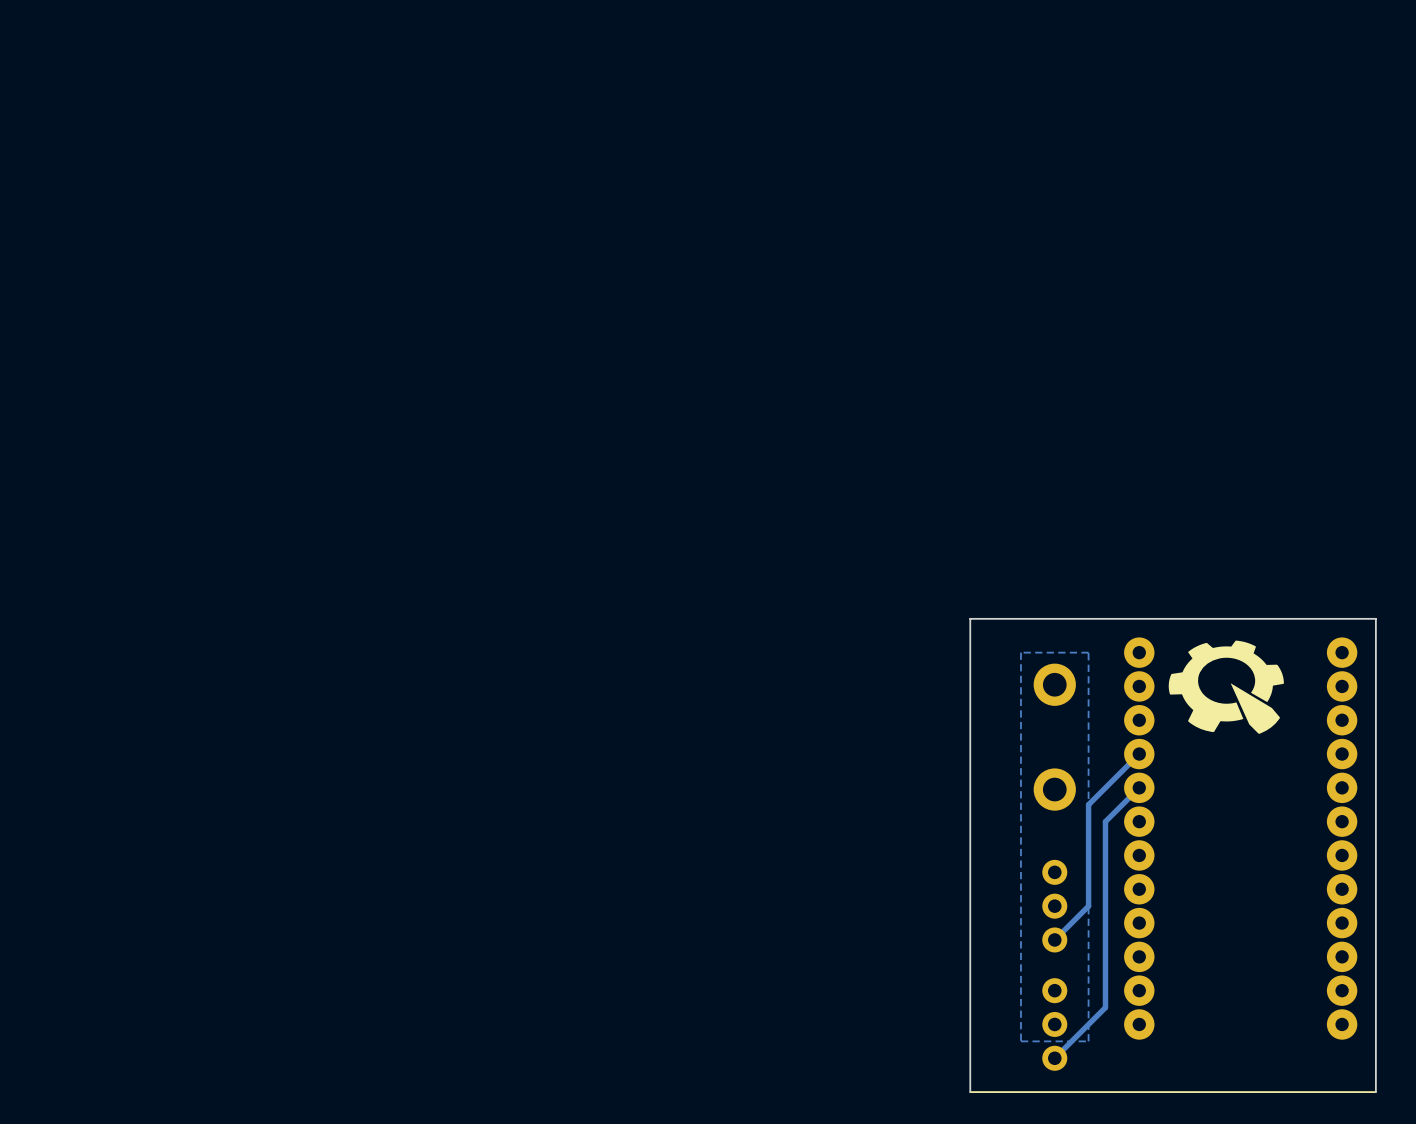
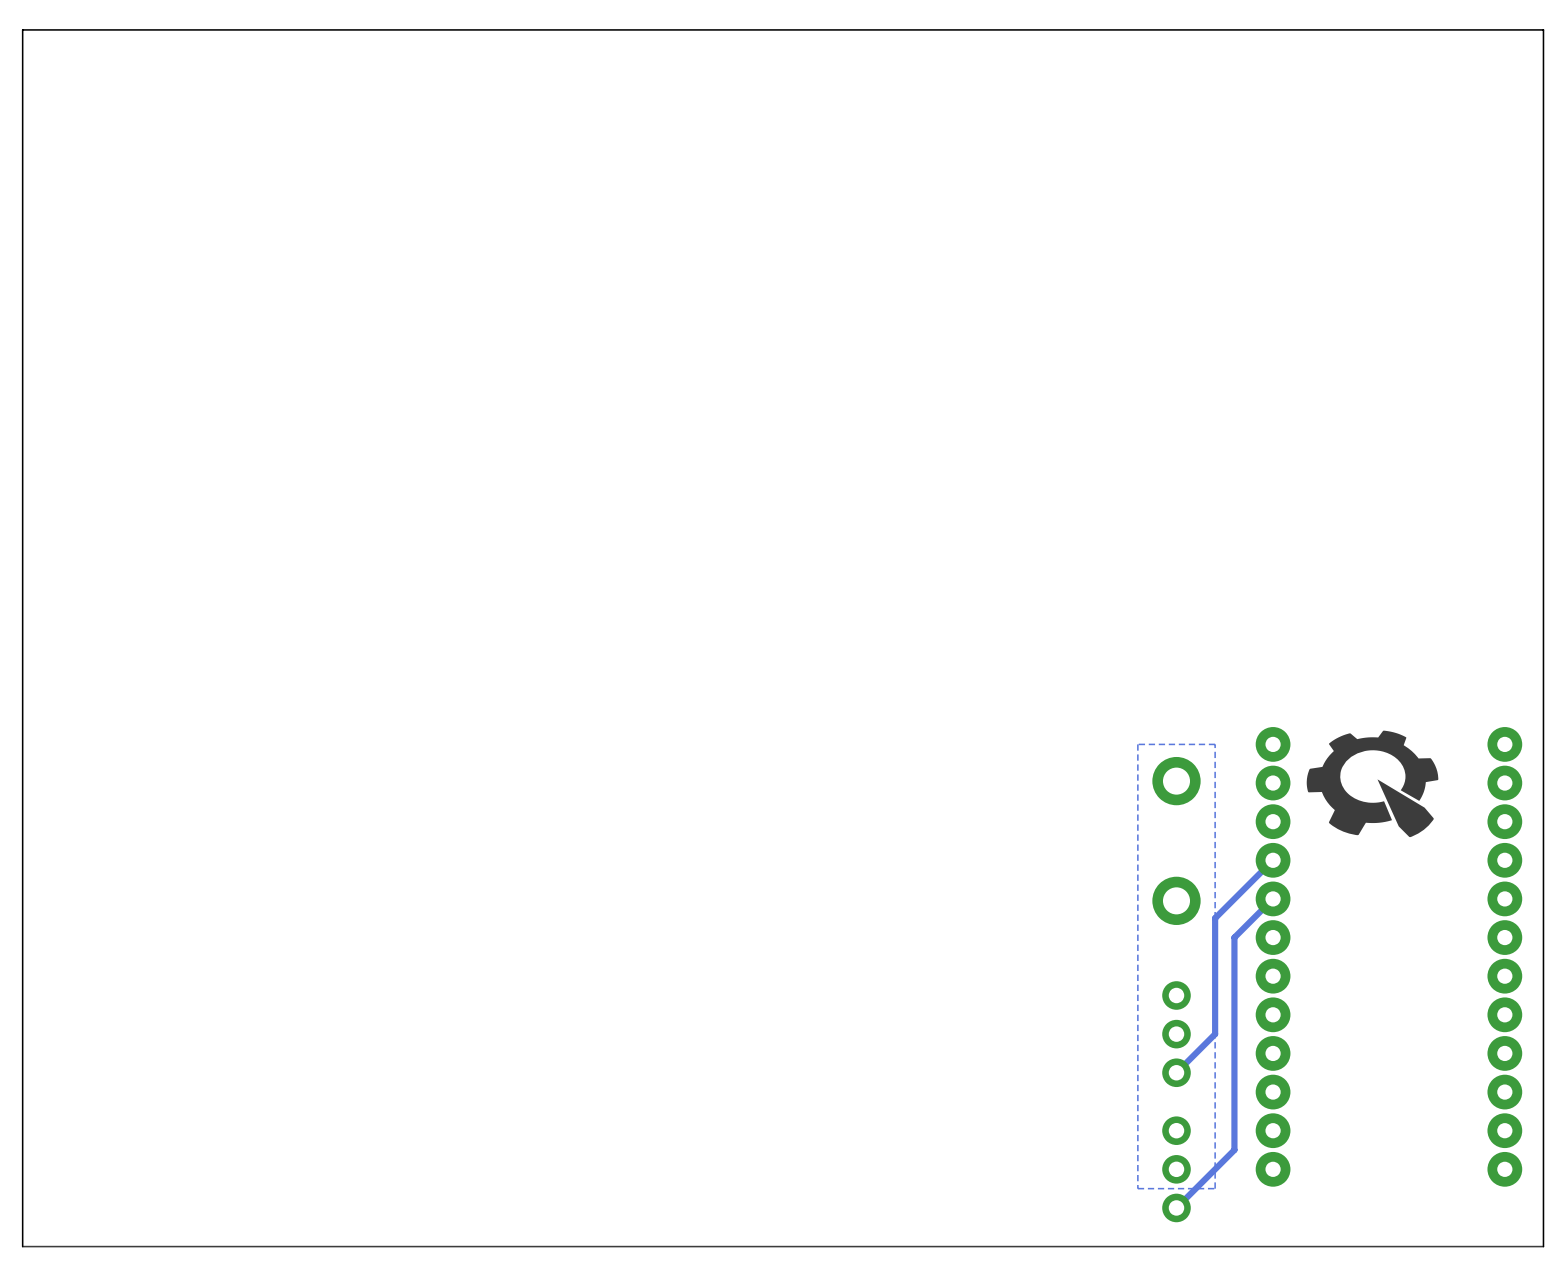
board edge: (1375, 618) (970, 618) (970, 1092) -> (1543, 705) (1543, 29) (22, 29) (22, 1246)
line: none -> (1079, 1246) (22, 1246)

